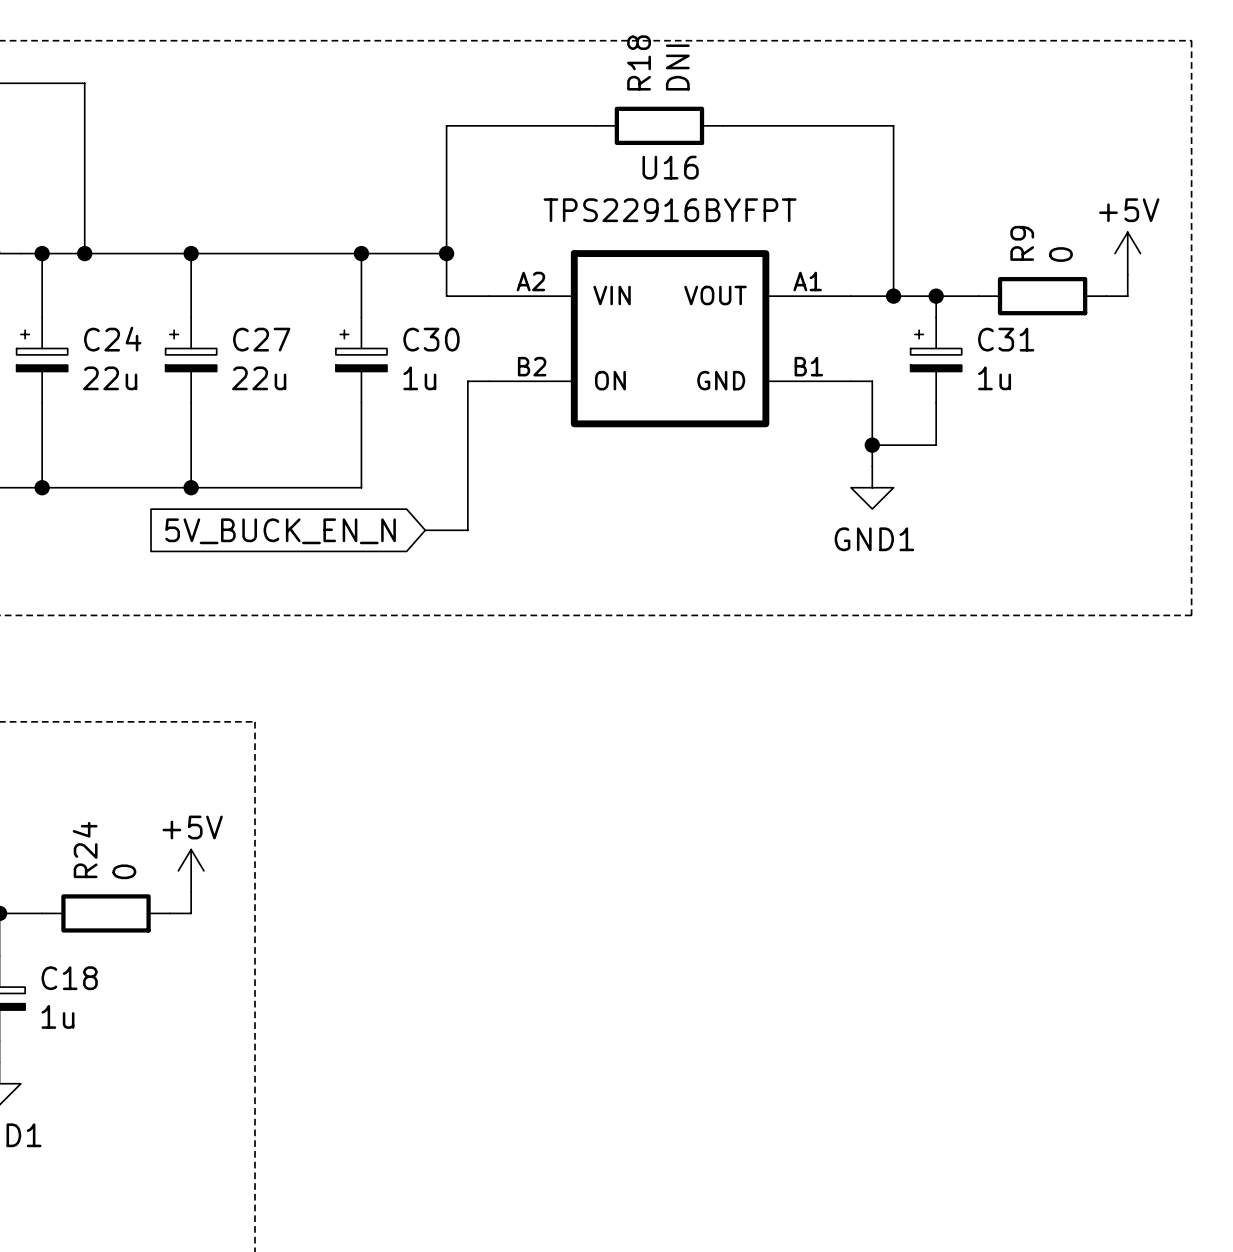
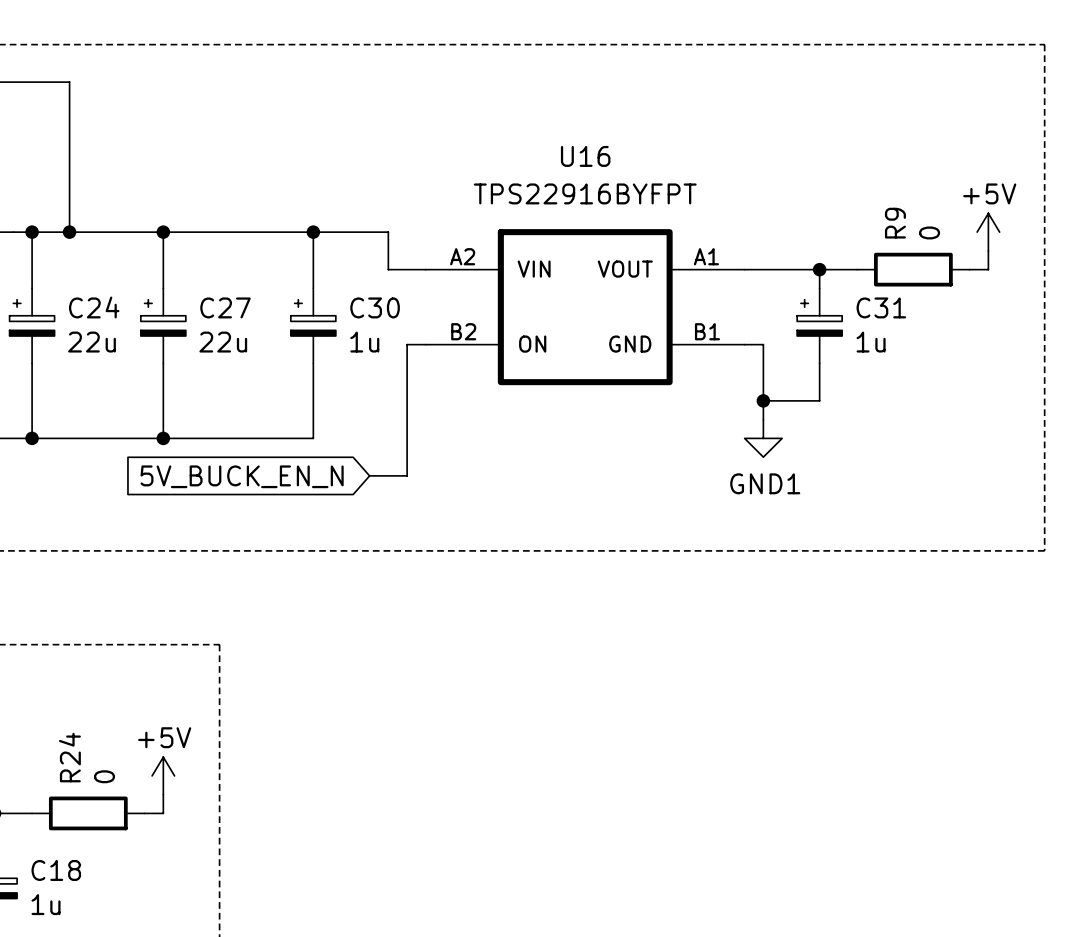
wire: (595, 125) (446, 125) (446, 253) -> none
R18: DNI (659, 125) -> none
wire: (723, 125) (893, 125) (893, 296) -> none
junction: (446, 253) -> none
junction: (893, 296) -> none

